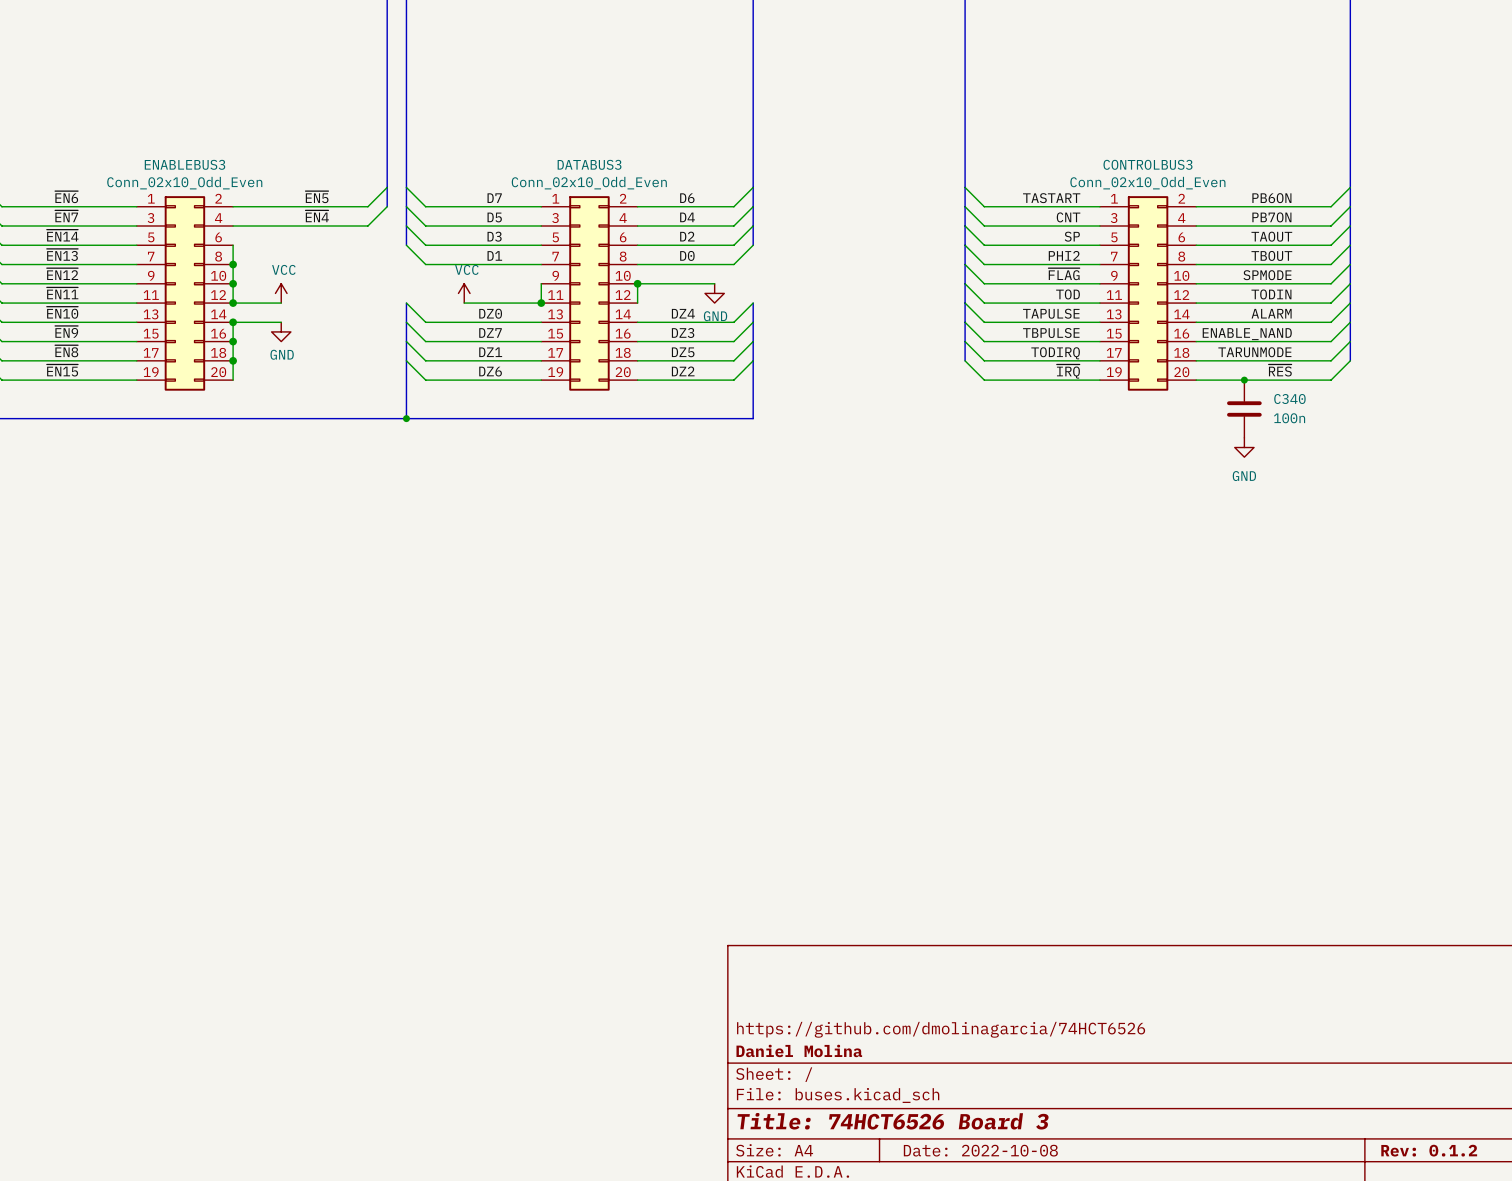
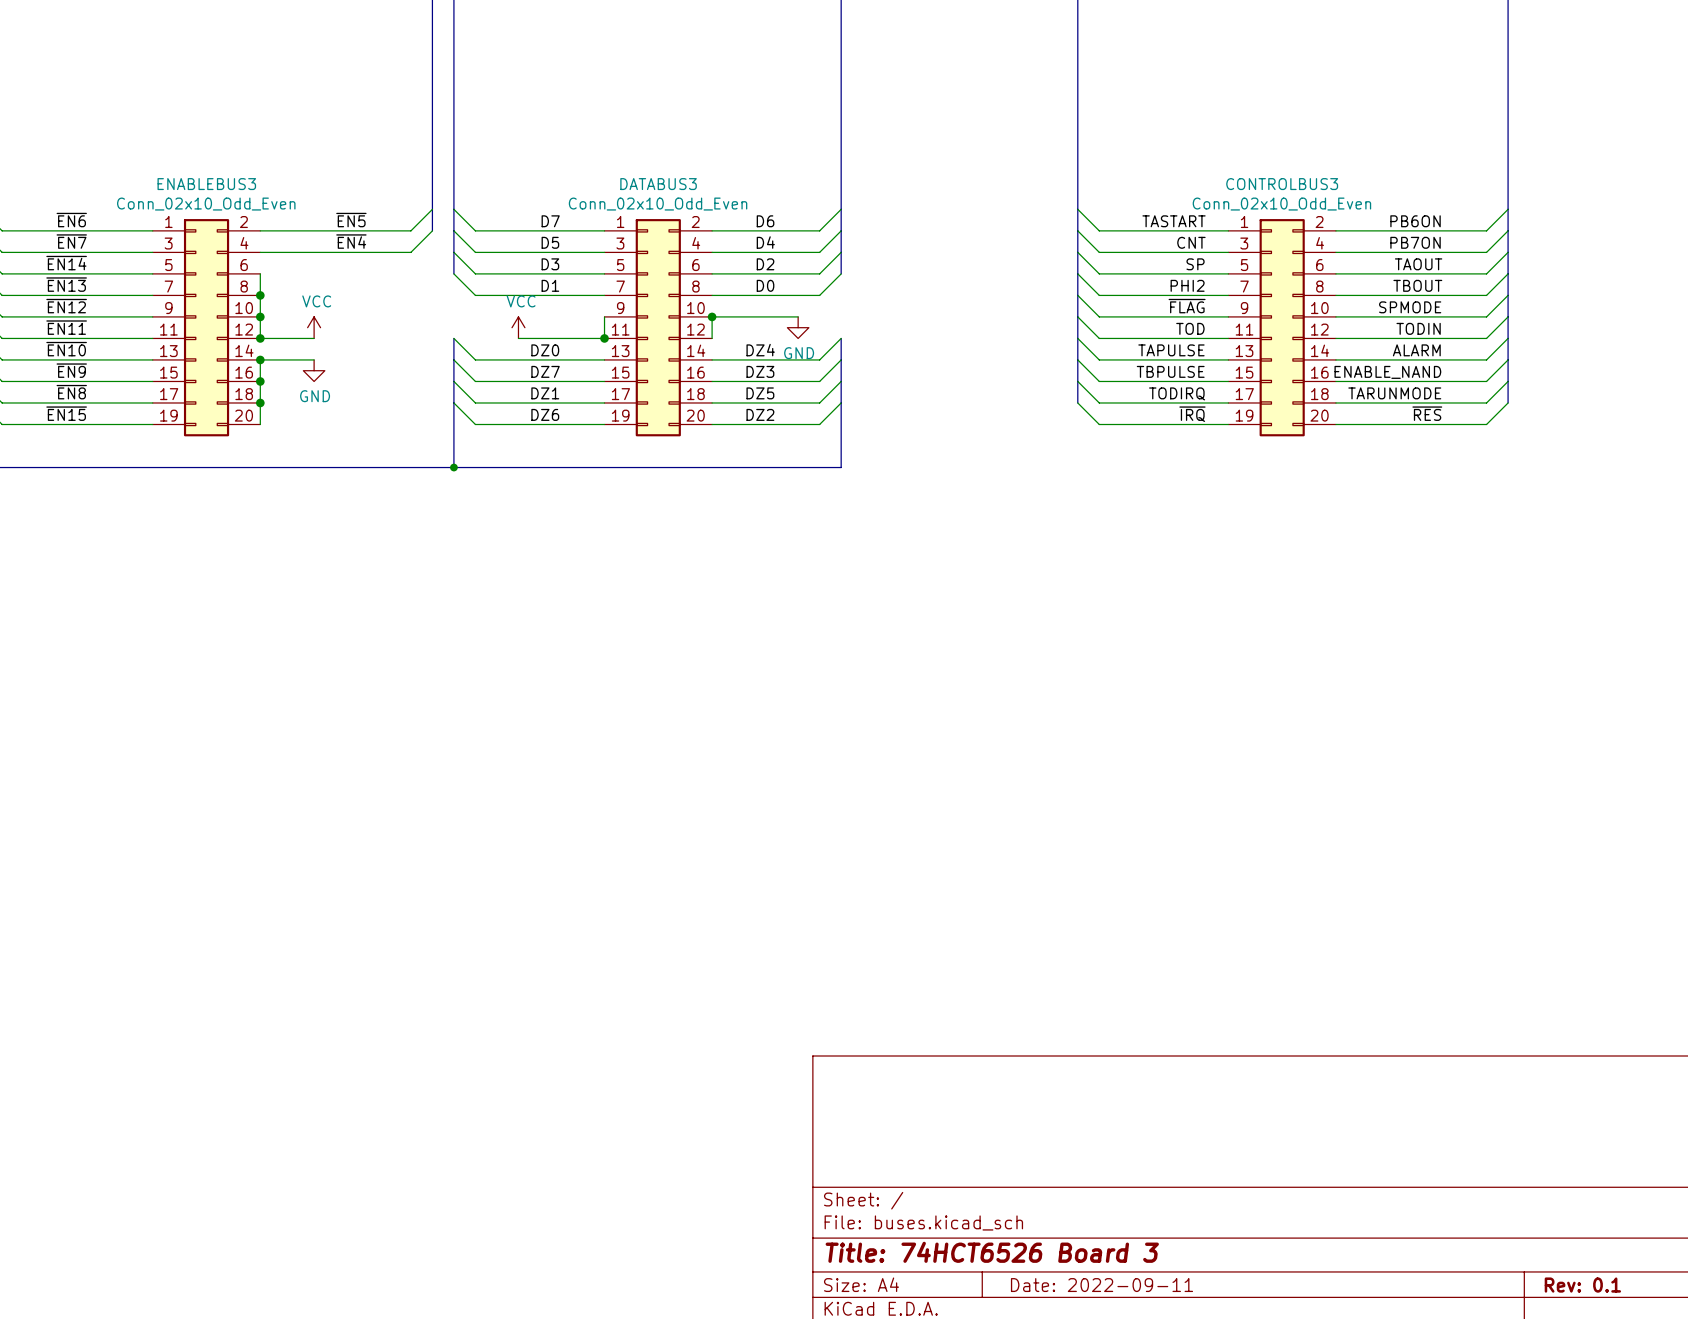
junction: (1244, 380) -> none
C340: 100n (1244, 408) -> none
power symbol: GND (1244, 447) -> none
title block: https://github.com/dmolinagarcia/74HCT6526 (941, 1029) -> none
title block: Daniel Molina (799, 1050) -> none
title block: Date: 2022-10-08 (980, 1150) -> Date: 2022-09-11 (1101, 1285)
title block: Rev: 0.1.2 (1429, 1150) -> Rev: 0.1 (1582, 1285)

